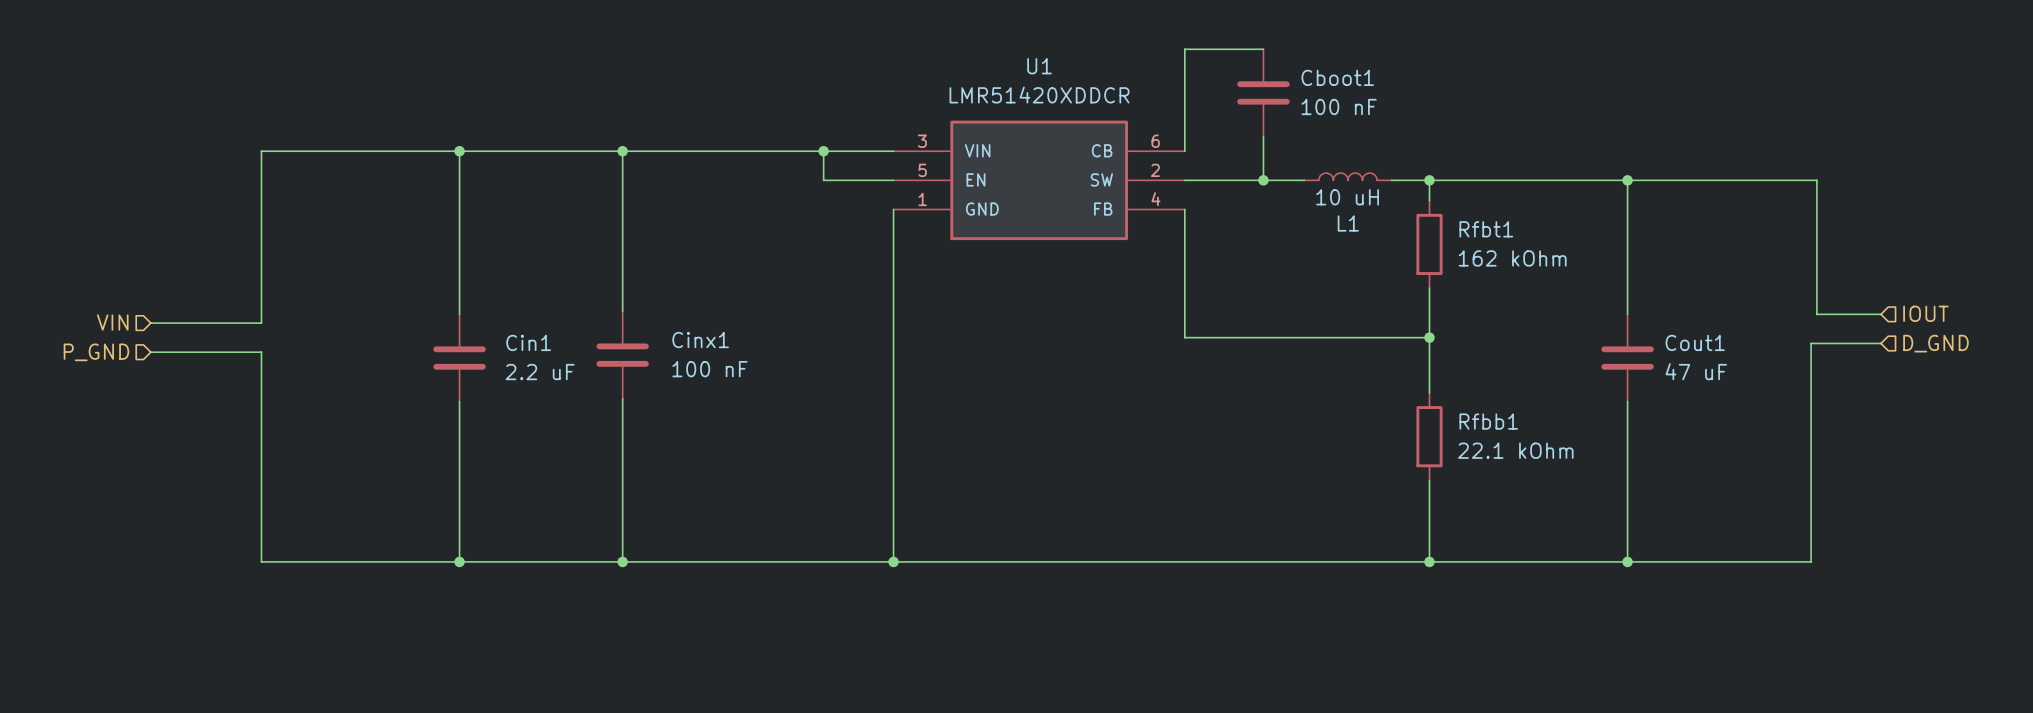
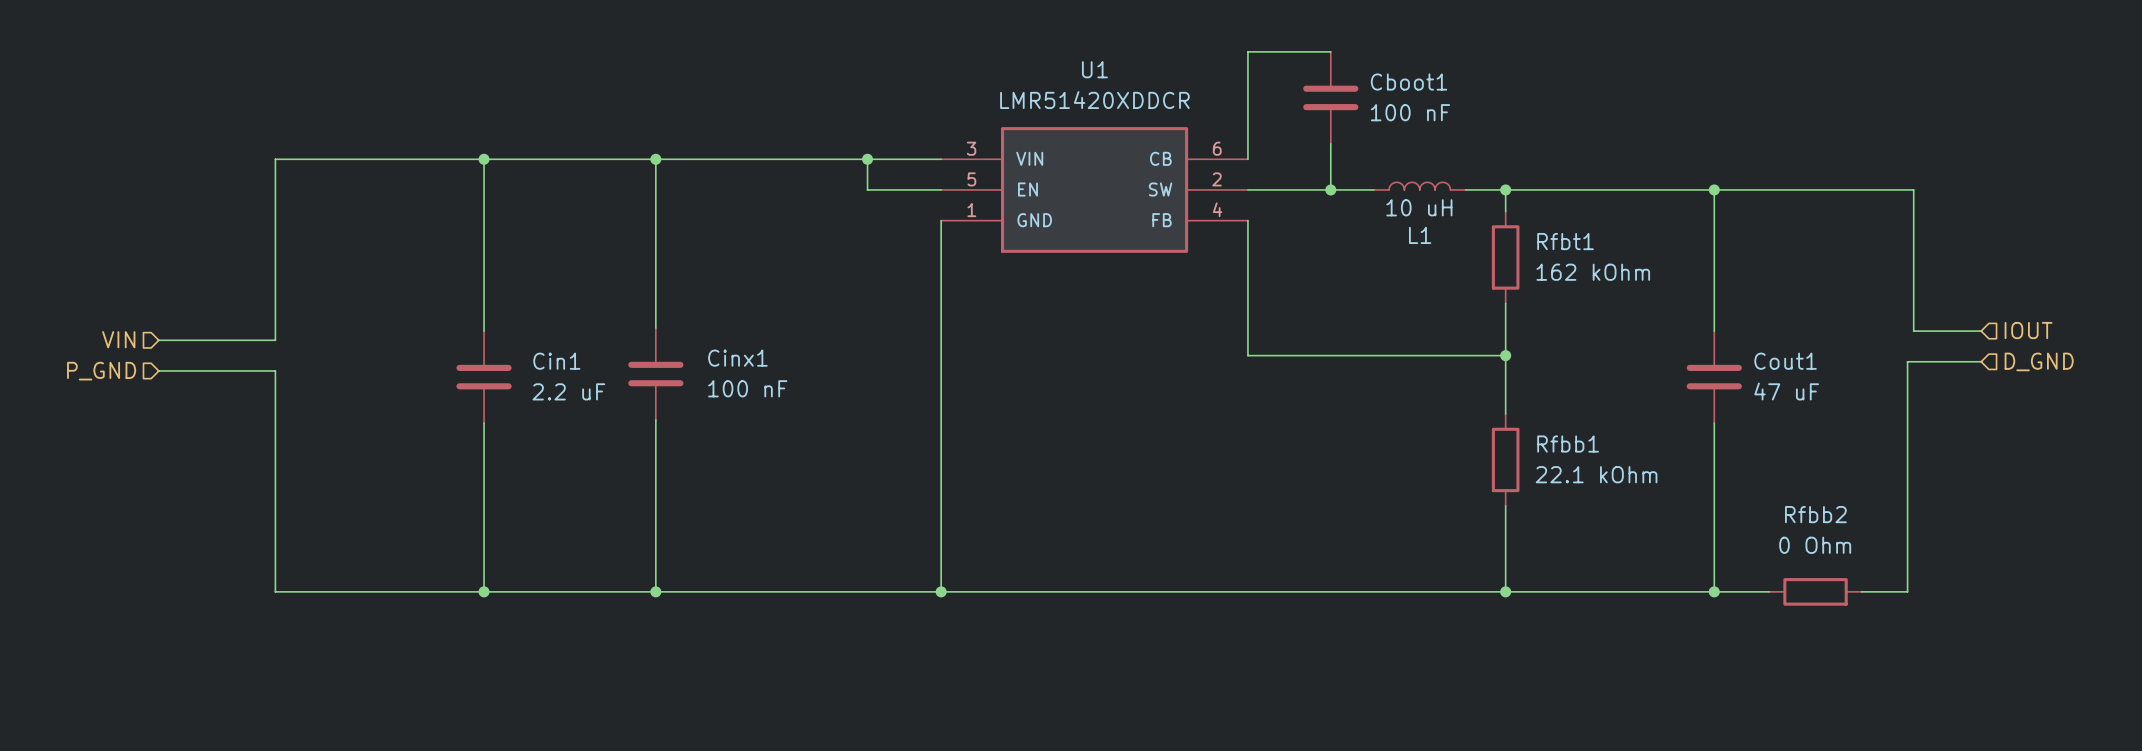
wire: (1679, 561) (1767, 561) -> none
Rfbb2: none -> 0 Ohm (1815, 591)

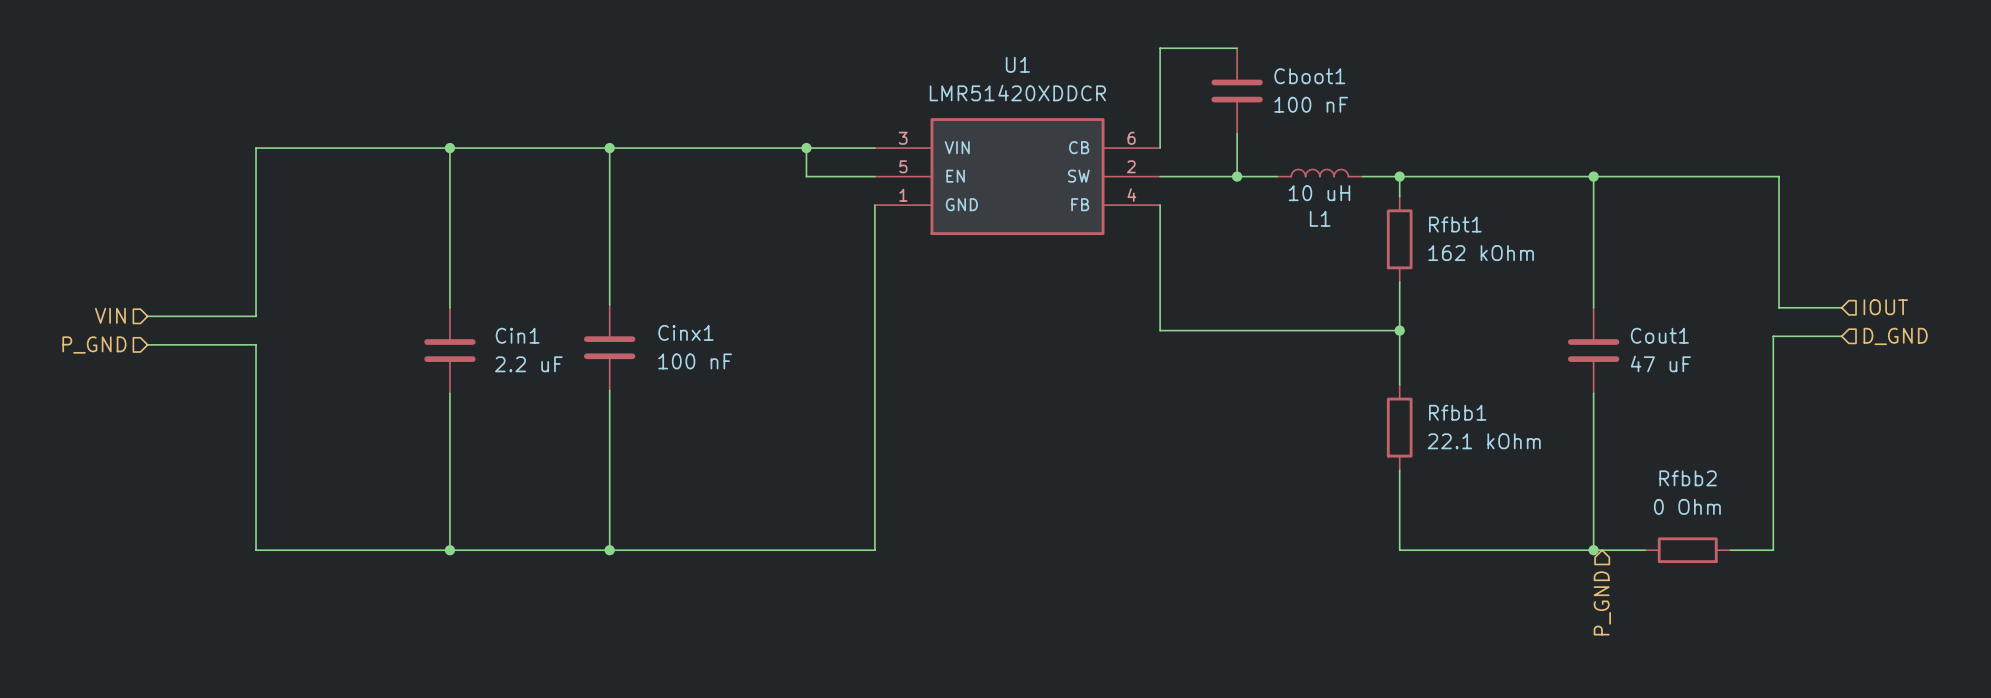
wire: (941, 591) (1505, 591) -> none
junction: (941, 591) -> none
junction: (1505, 591) -> none
hierarchical label: none -> P_GND (1602, 603)

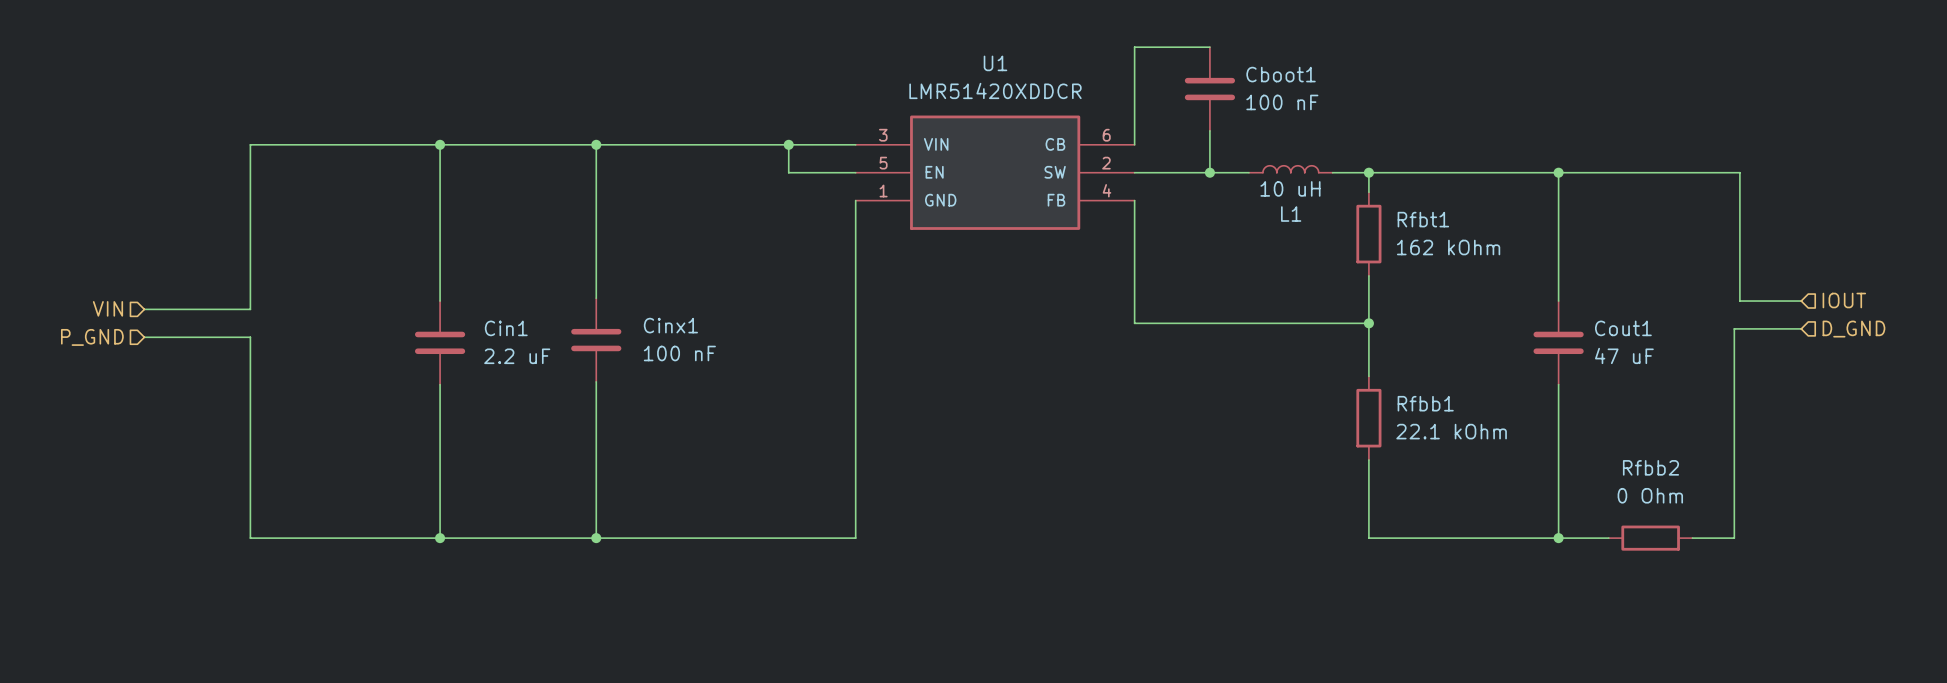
hierarchical label: P_GND (1602, 603) -> none

